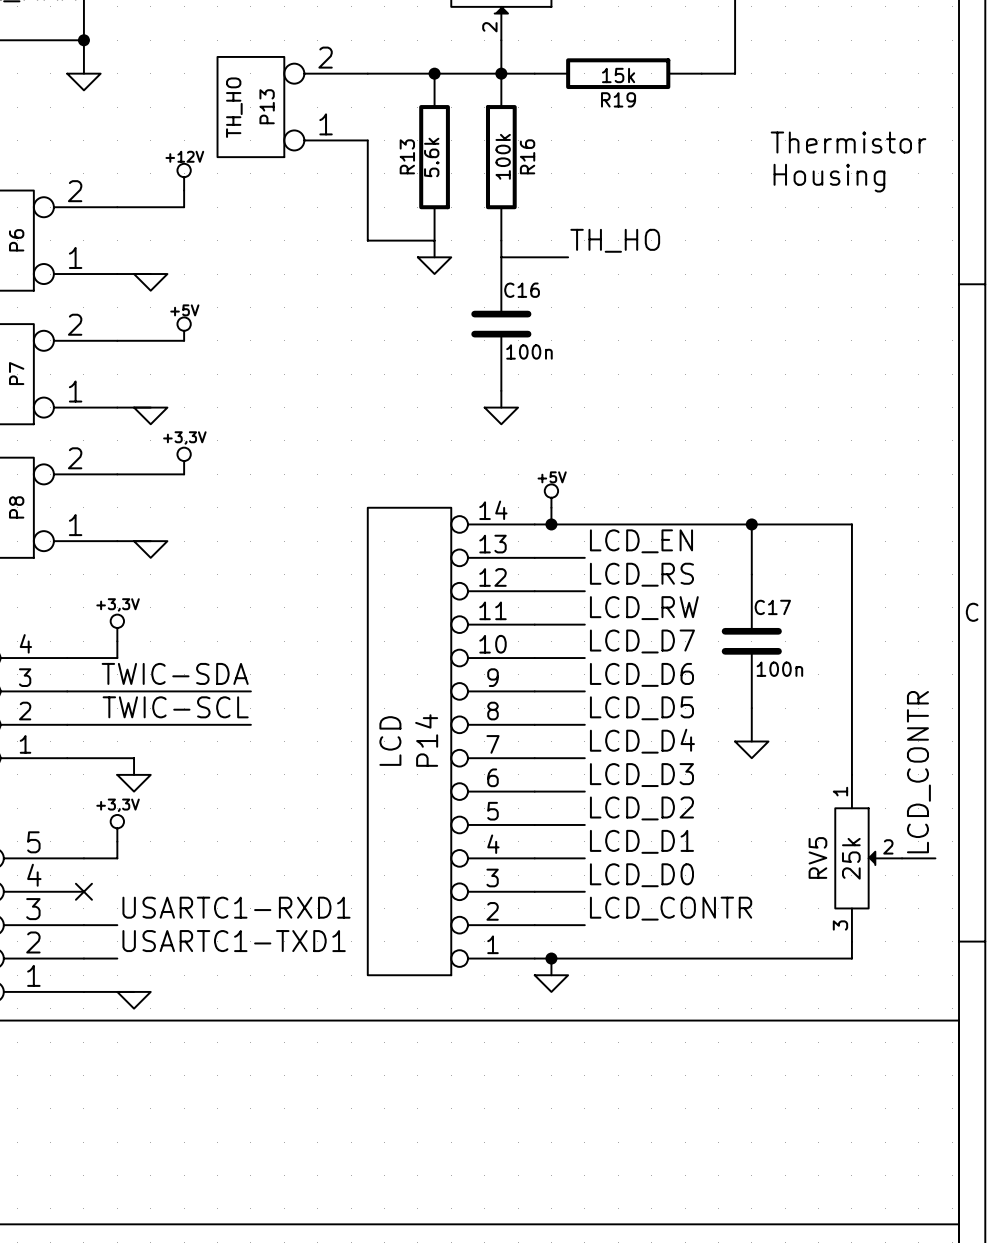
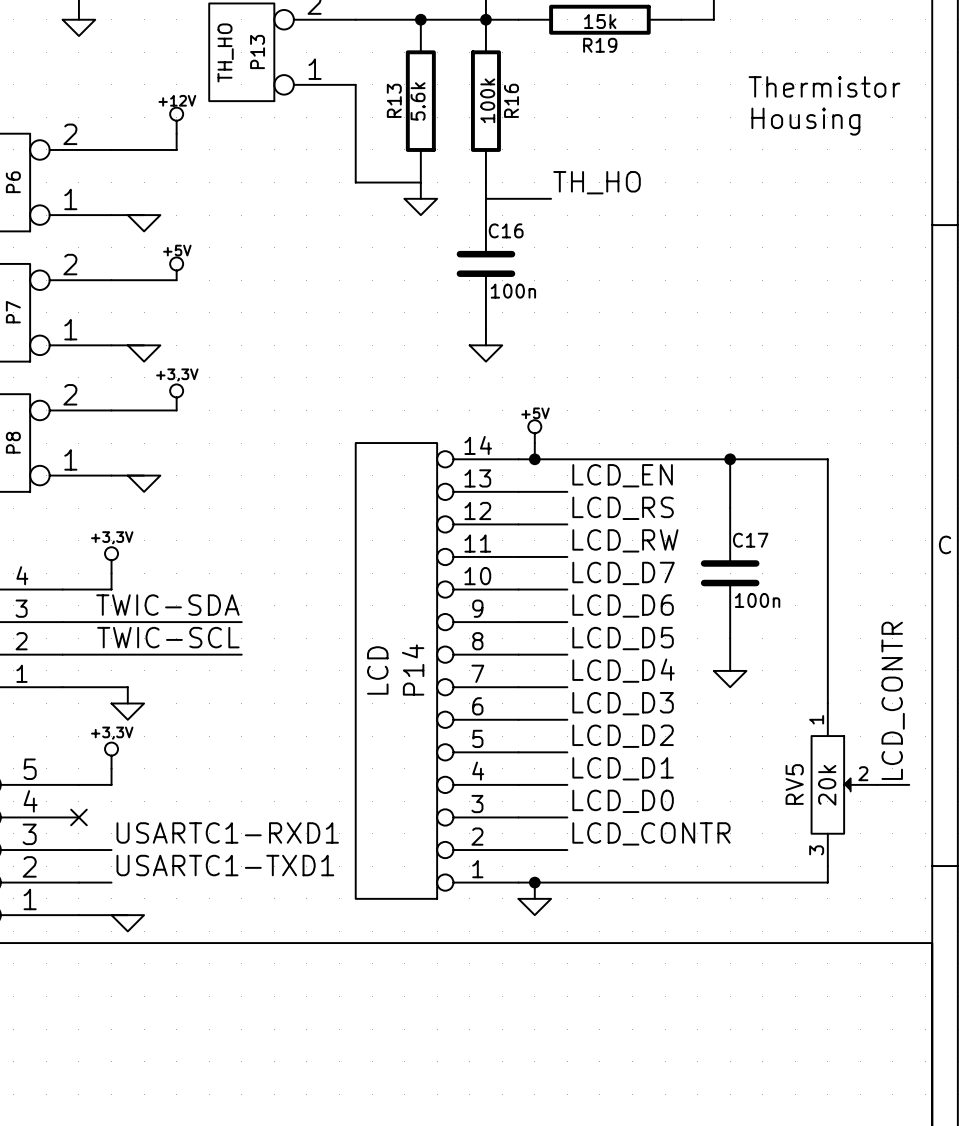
RV5 value: 25k (851, 858) -> 20k (827, 785)

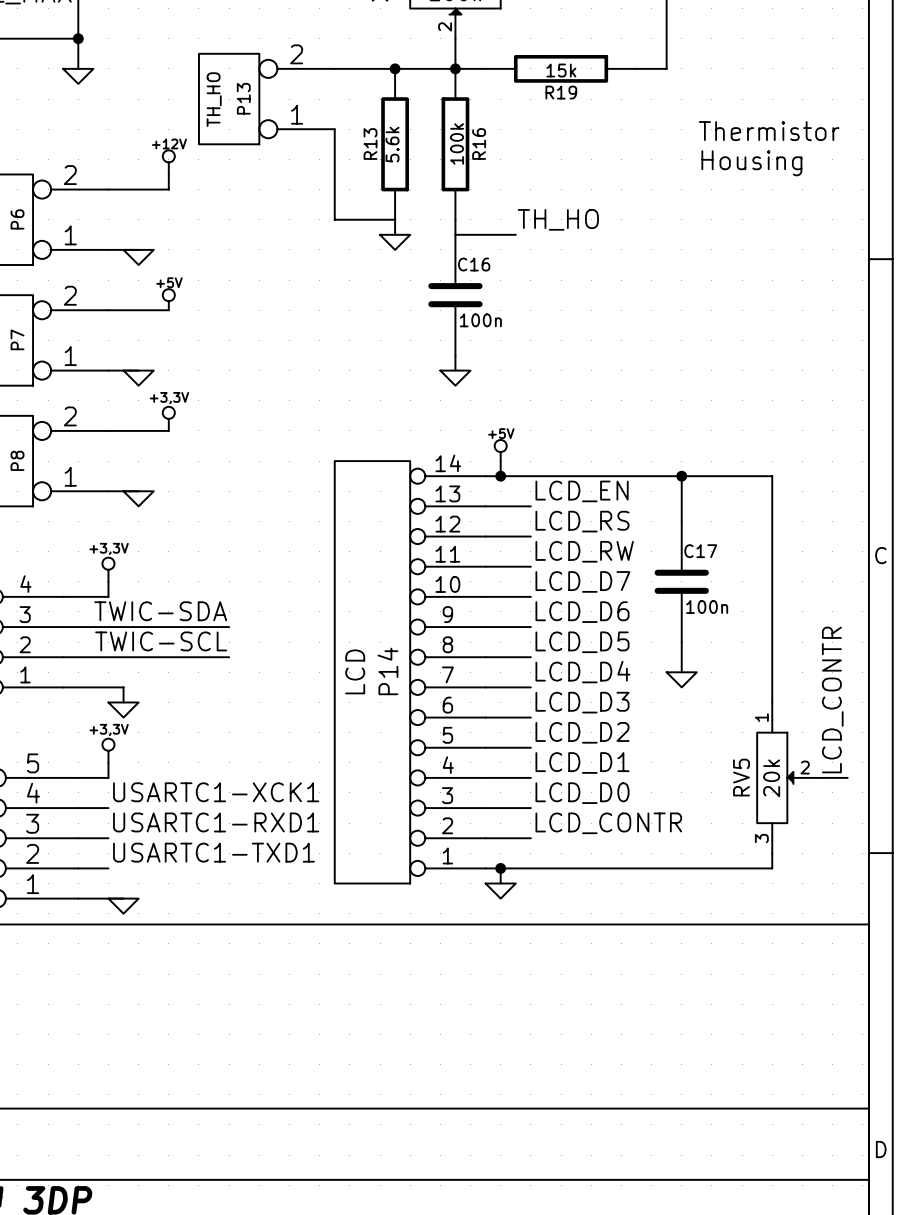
label: none -> USARTC1-XCK1 (216, 792)
wire: none -> (78, 808) (108, 808)
no-connect mark: (78, 817) -> none

